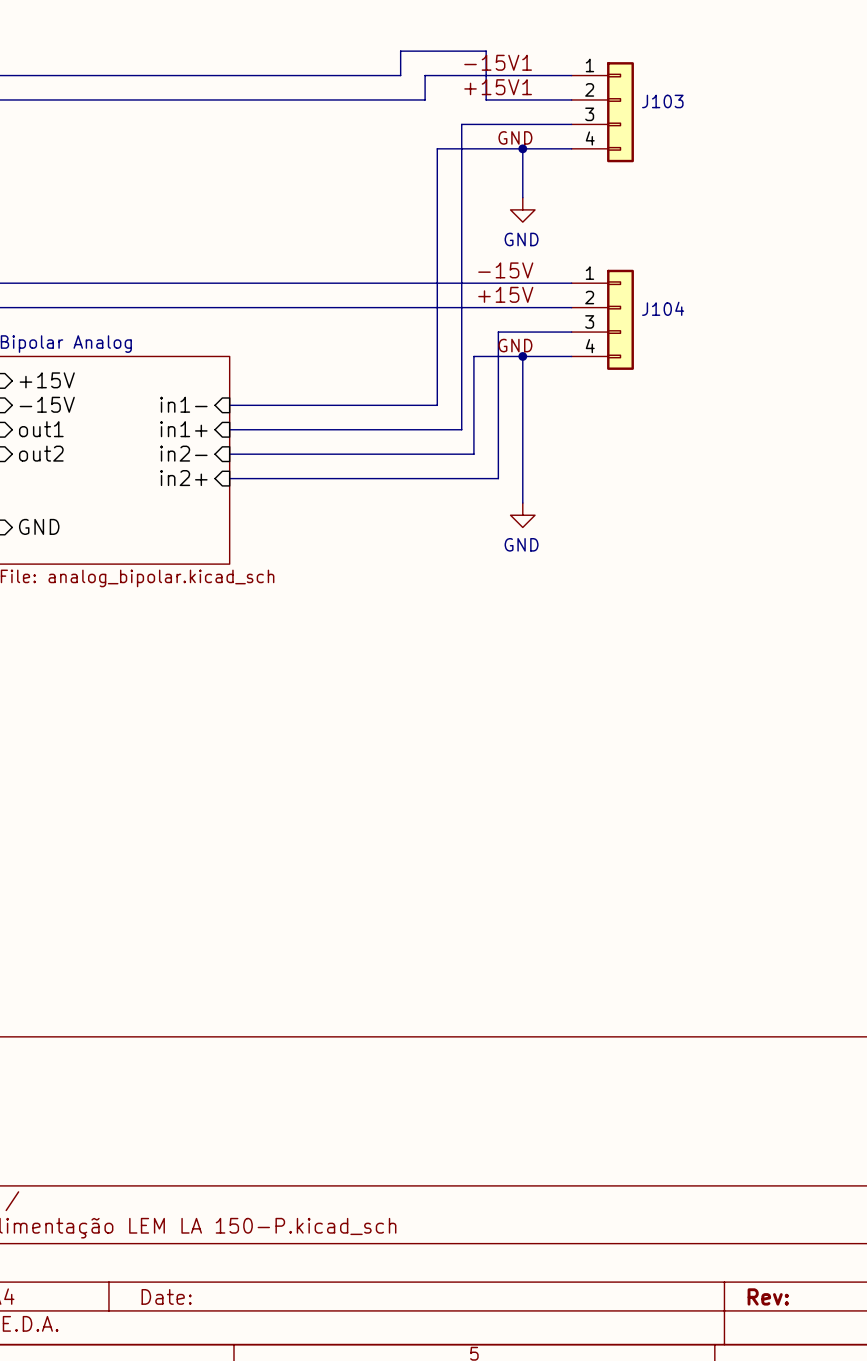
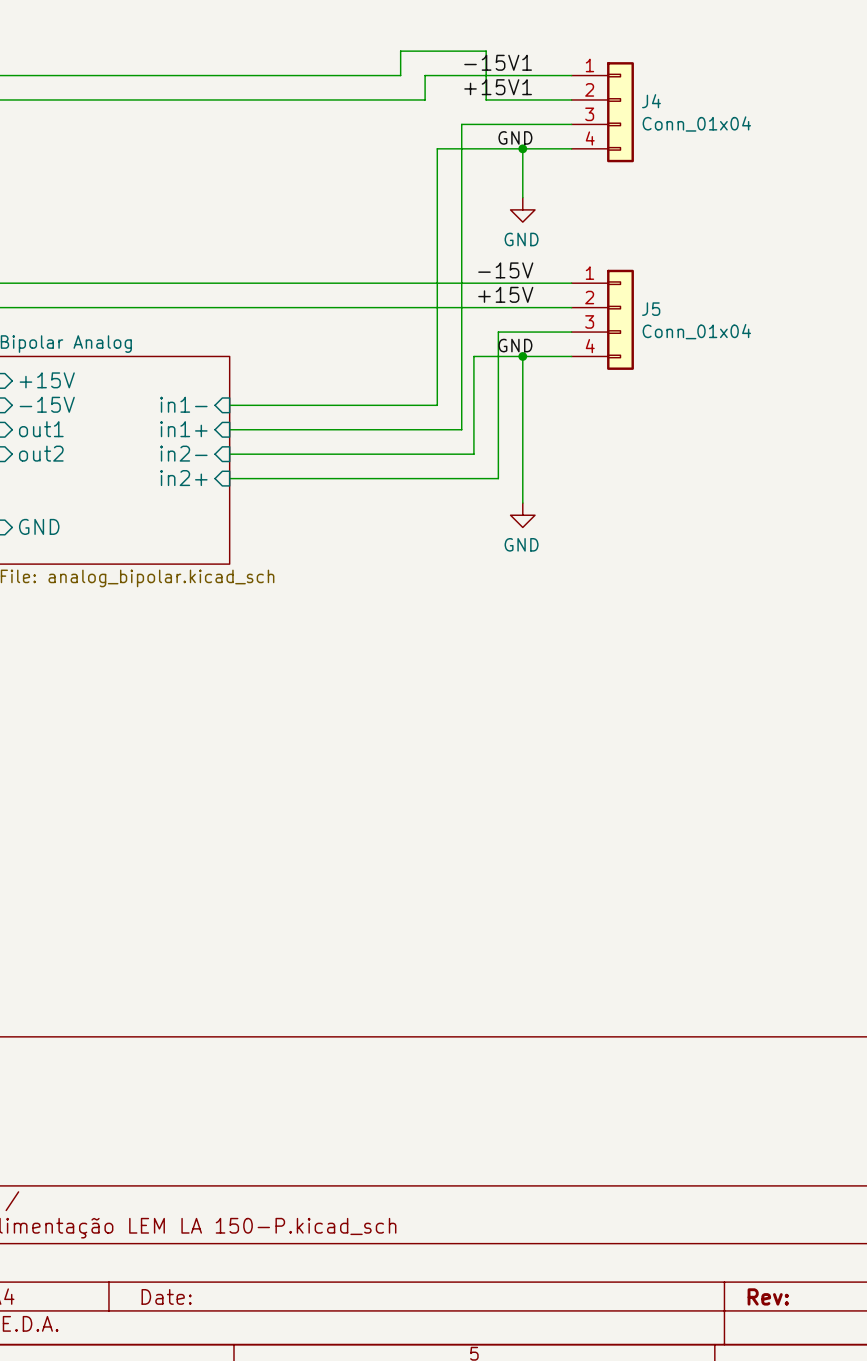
J103 name: J103 (662, 101) -> J4 (651, 101)
J103 value: none -> Conn_01x04 (696, 124)
J104 name: J104 (663, 308) -> J5 (651, 309)
J104 value: none -> Conn_01x04 (696, 331)

